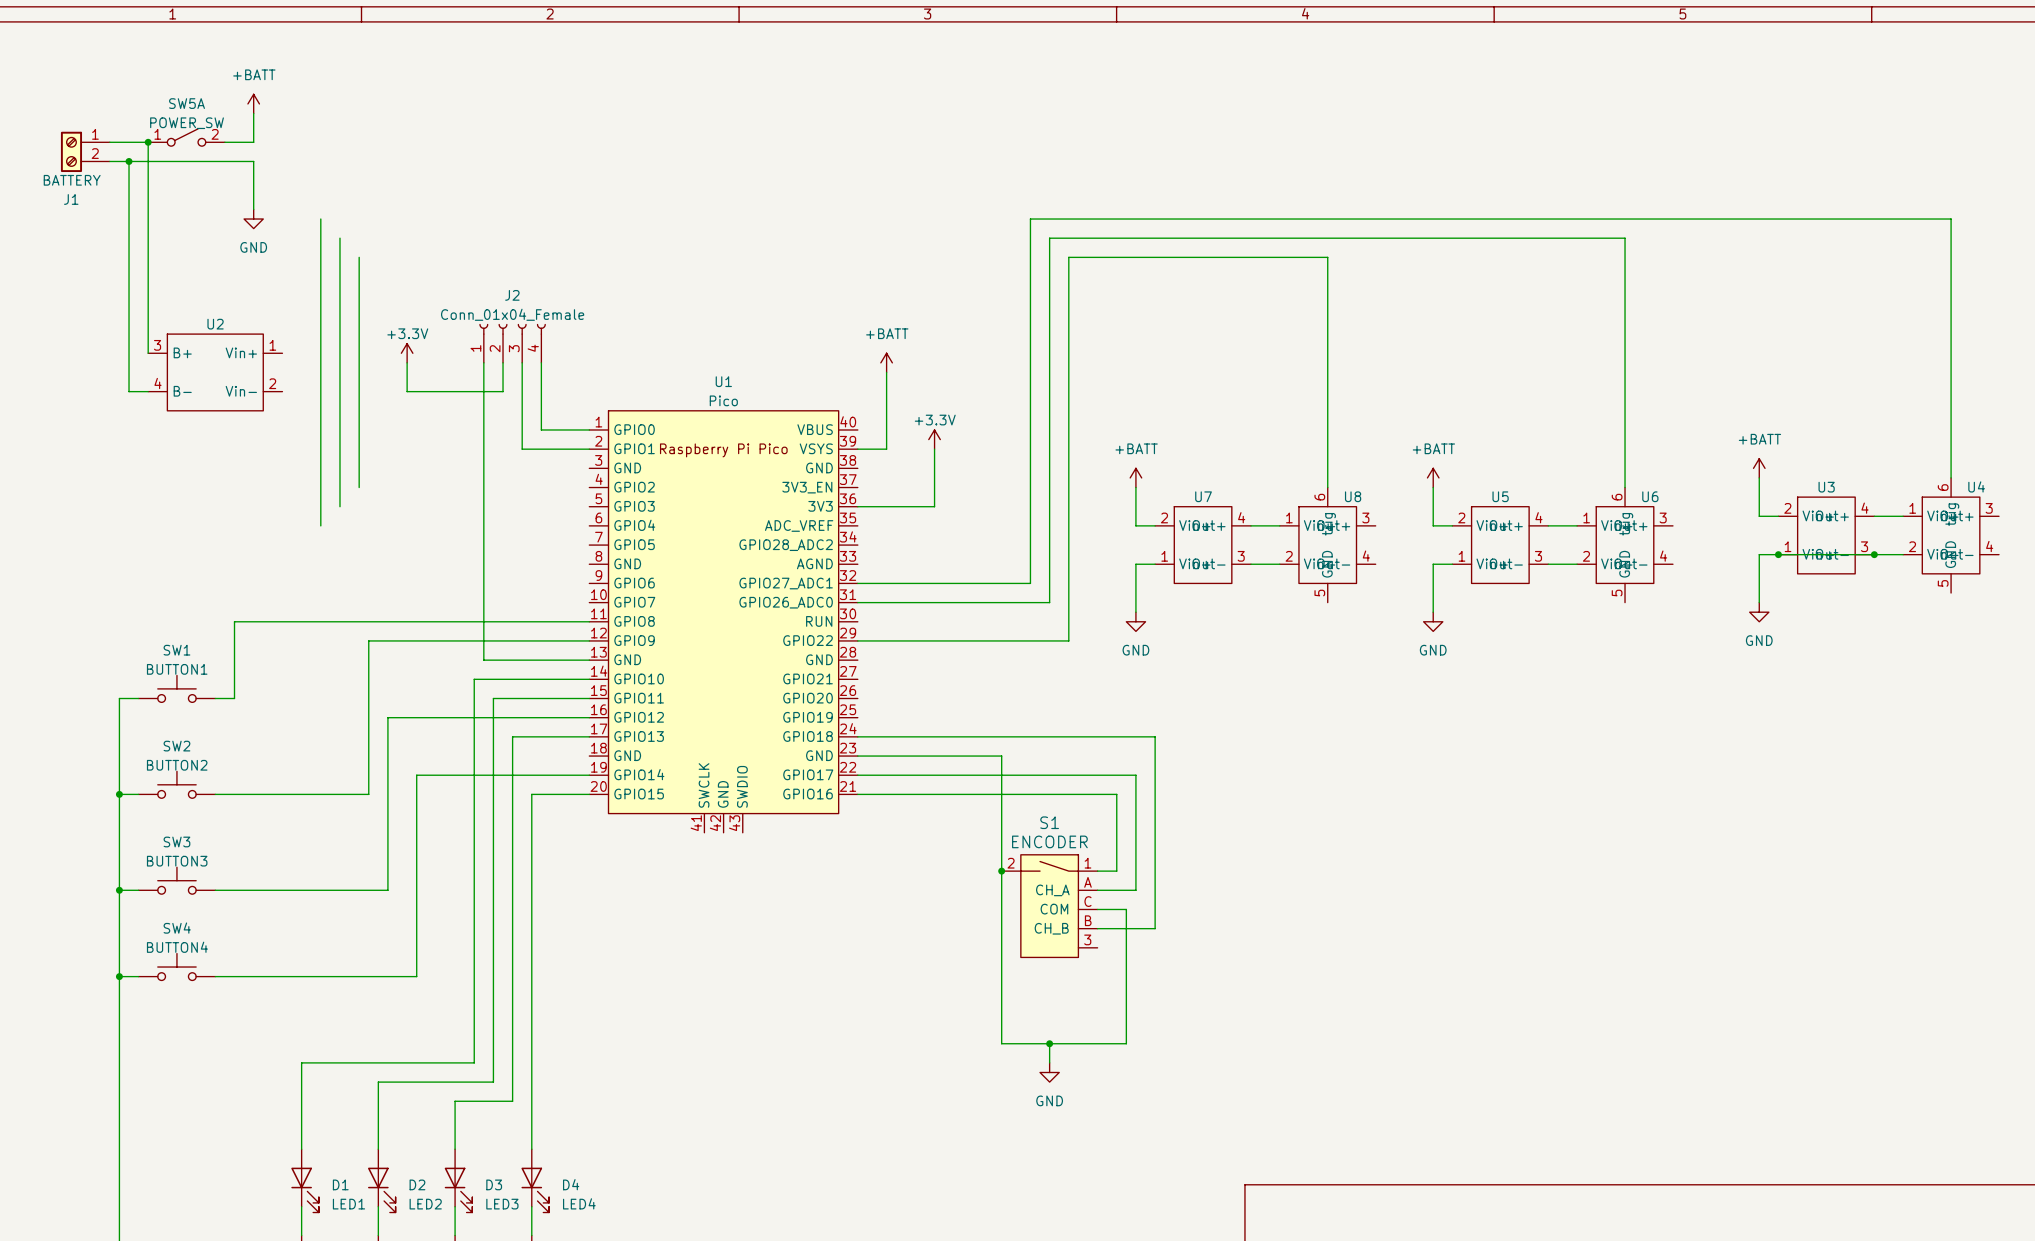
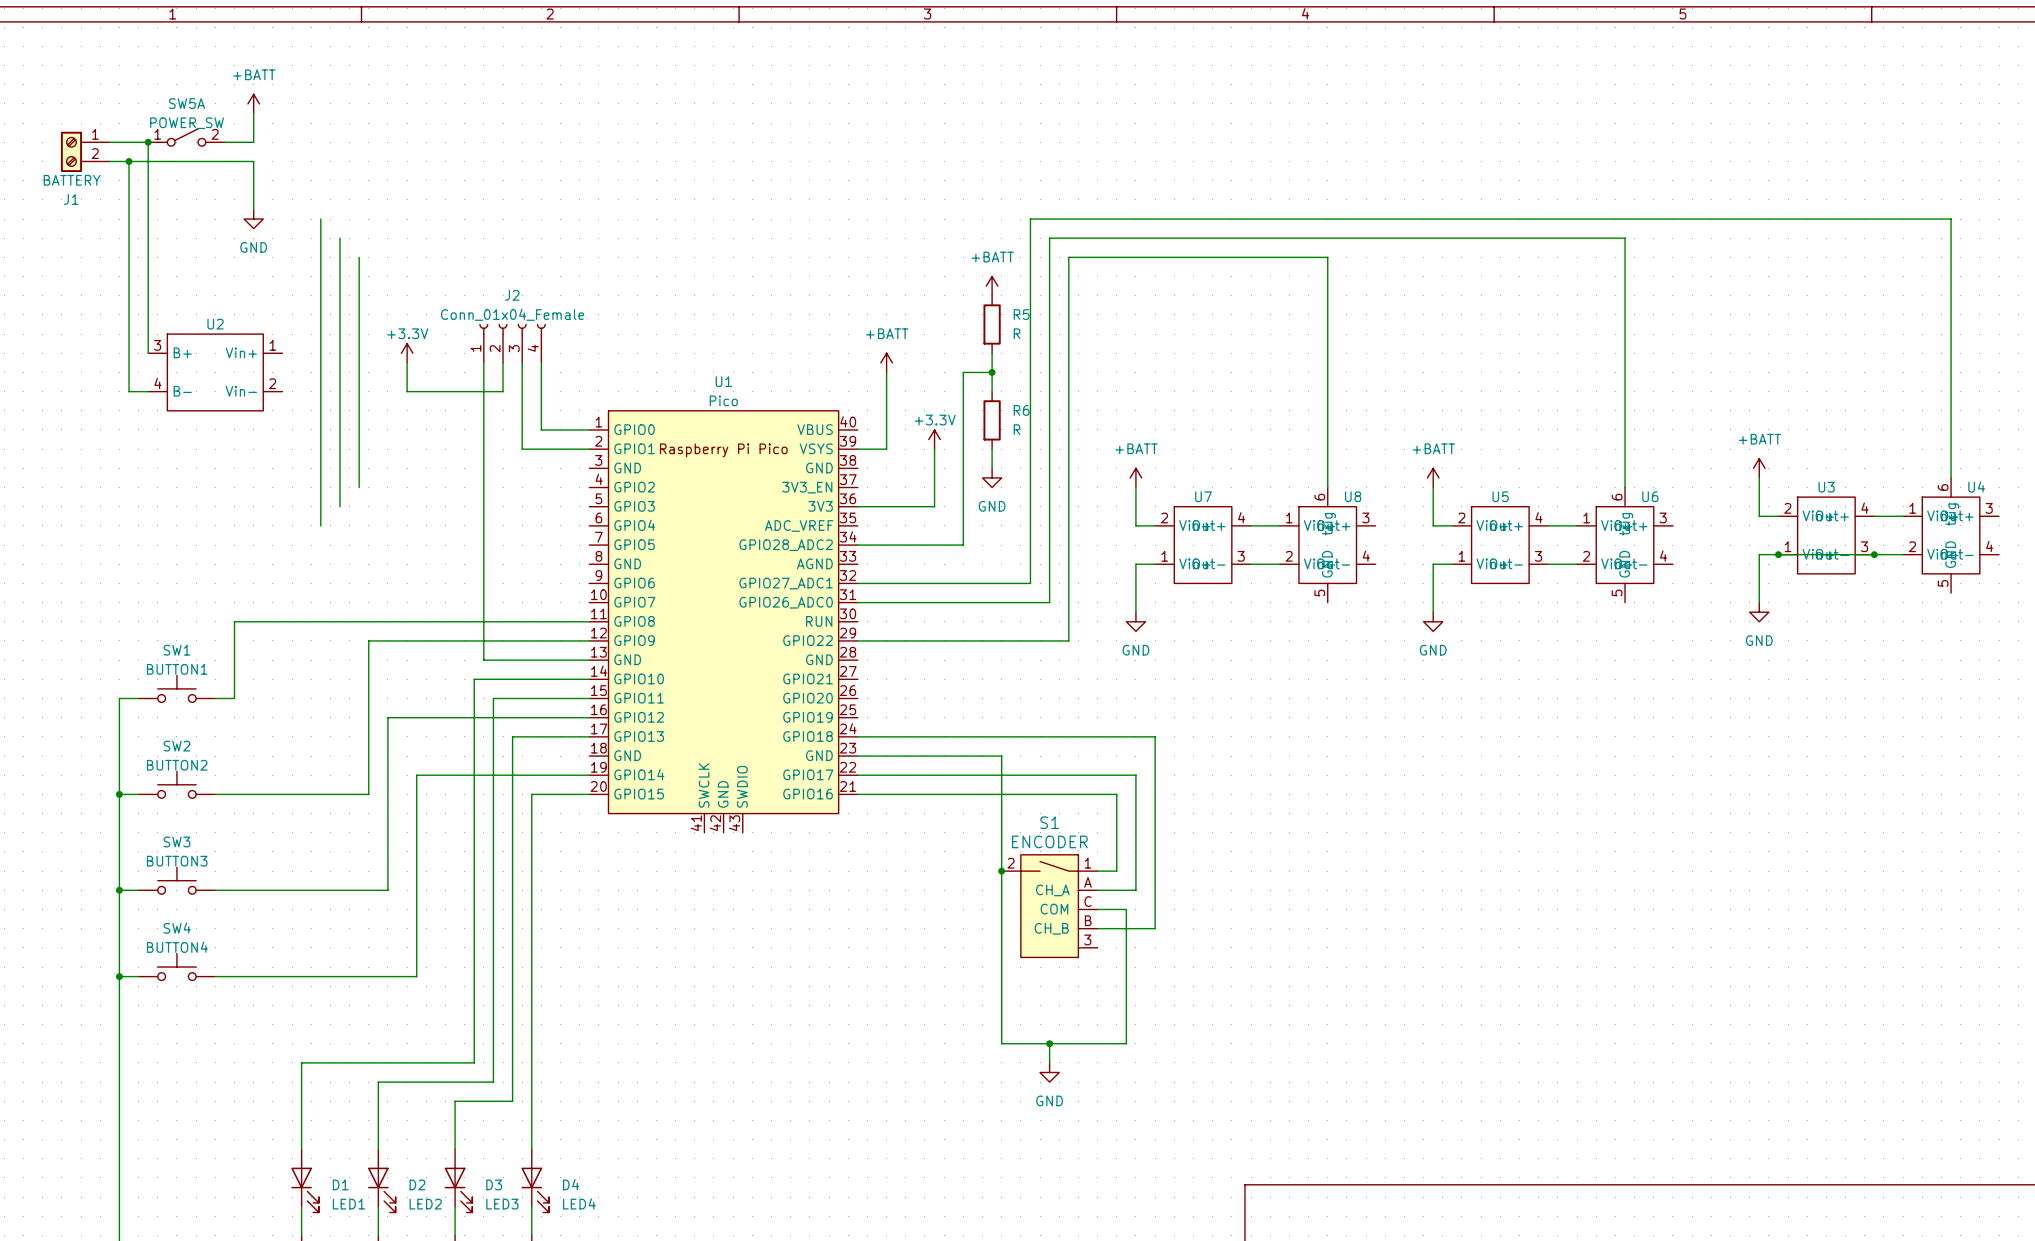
power symbol: none -> +BATT (992, 286)
R5: none -> R (992, 324)
wire: none -> (992, 353) (992, 391)
wire: none -> (992, 372) (963, 372) (963, 545) (857, 545)
junction: none -> (992, 372)
R6: none -> R (992, 420)
wire: none -> (992, 449) (992, 468)
power symbol: none -> GND (992, 477)

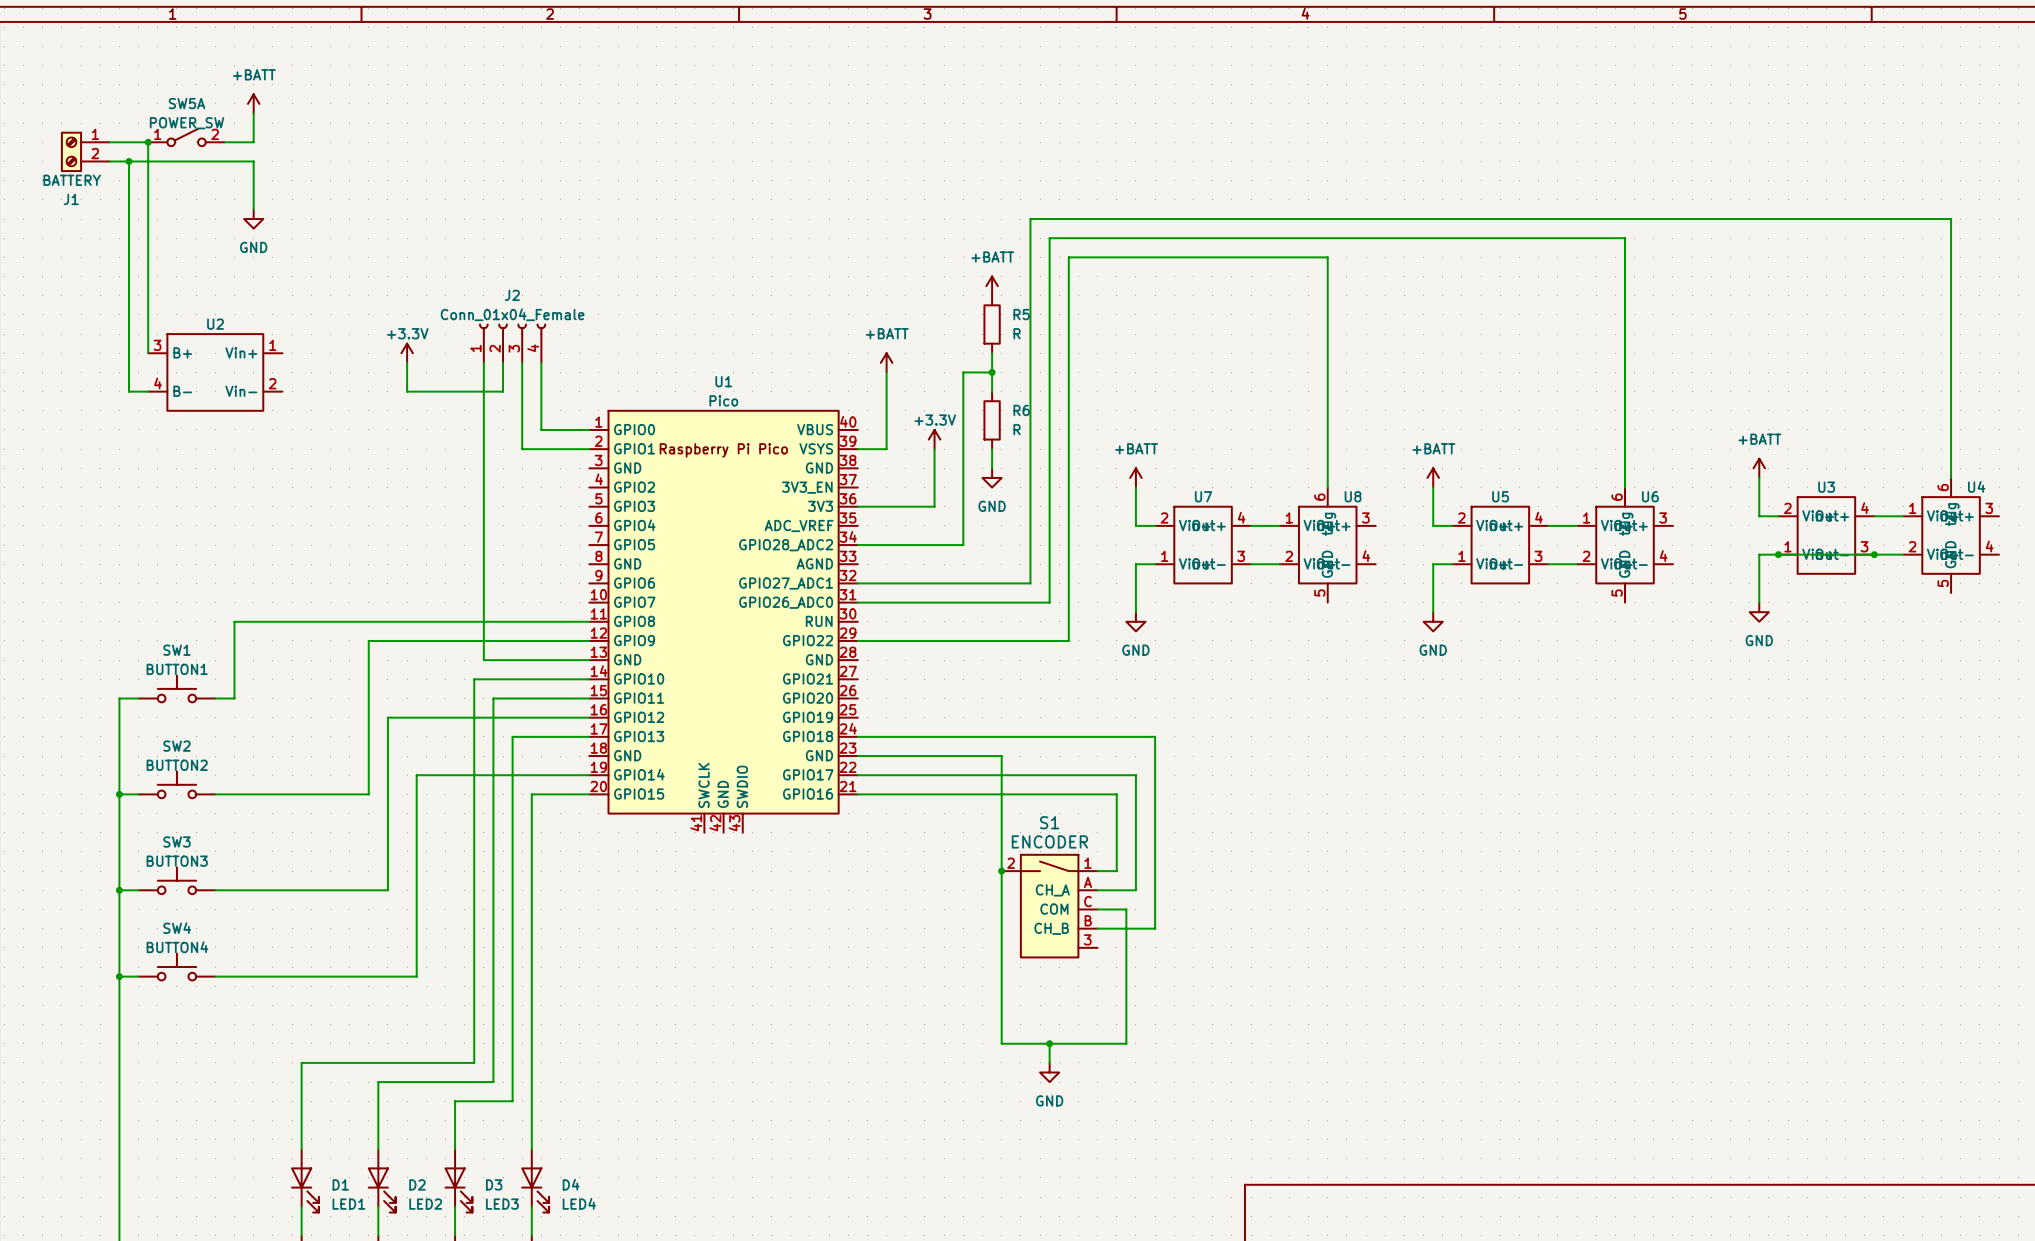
wire: (320, 219) (320, 525) -> none
wire: (339, 238) (339, 506) -> none
wire: (359, 257) (359, 487) -> none

